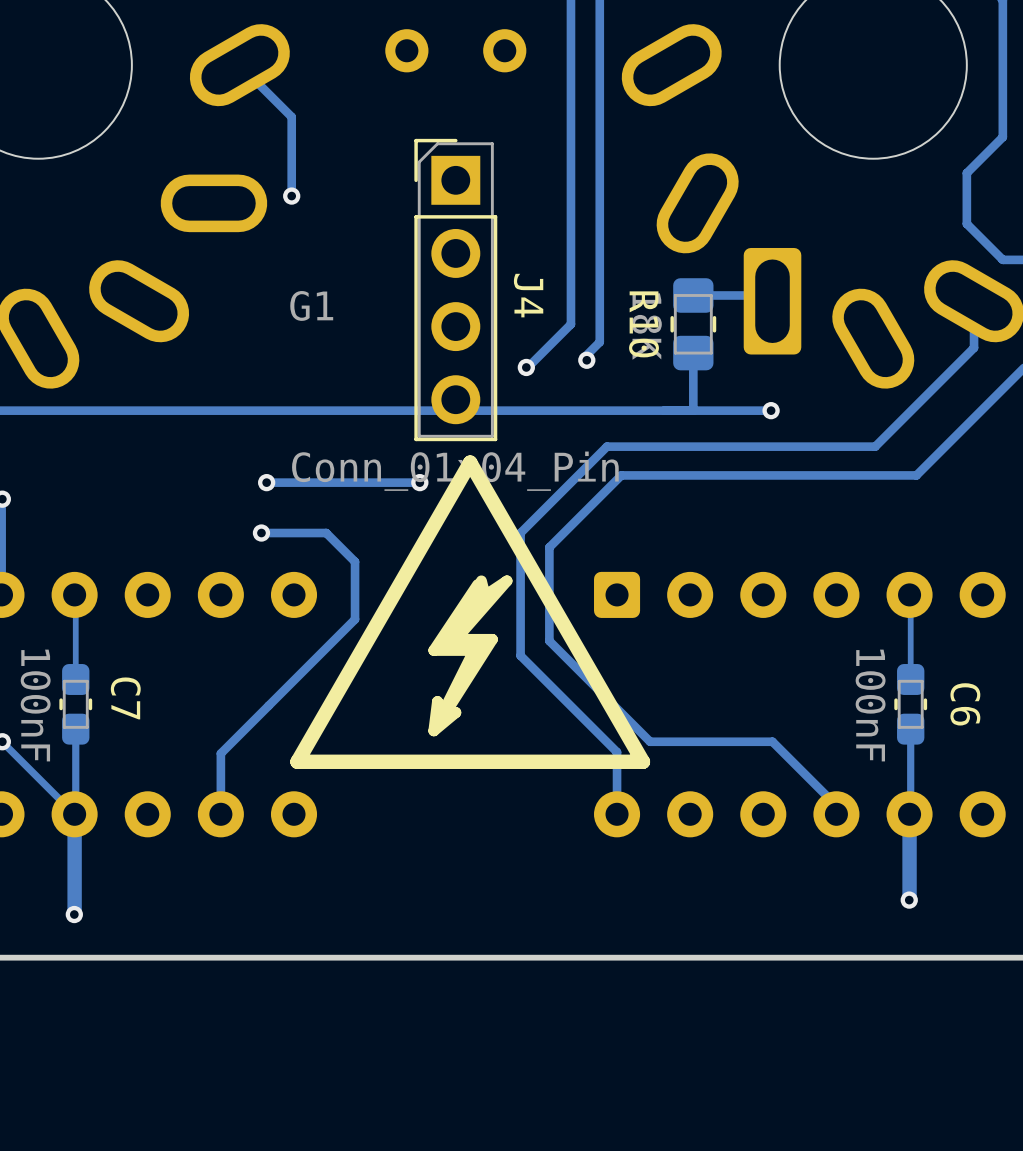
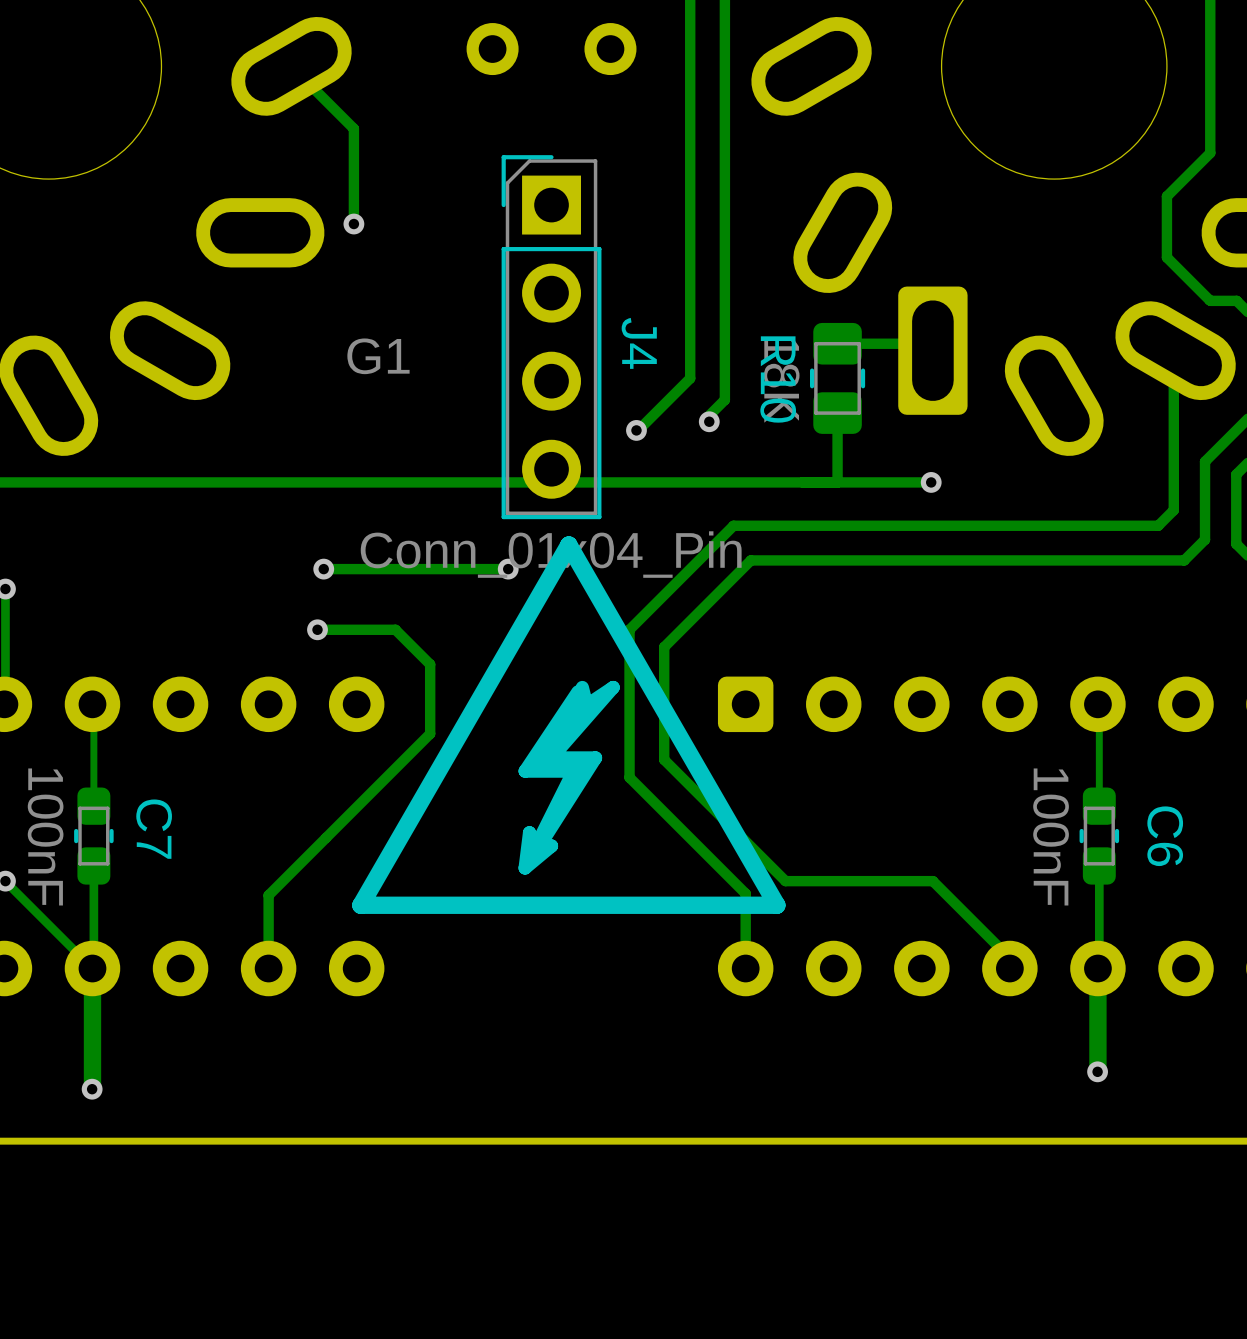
track: (974, 301) (974, 347) (875, 446) -> (1175, 350) (1173, 352) (1173, 510) (1158, 525) (1056, 525)
track: (998, 393) (916, 475) -> (1205, 461) (1205, 539) (1184, 560) (1106, 560)

